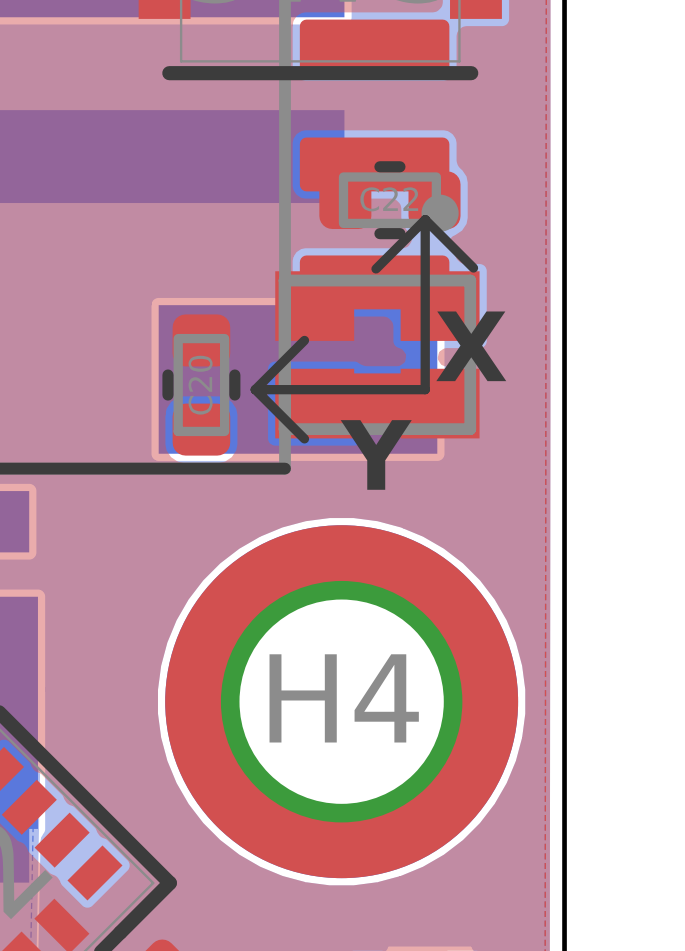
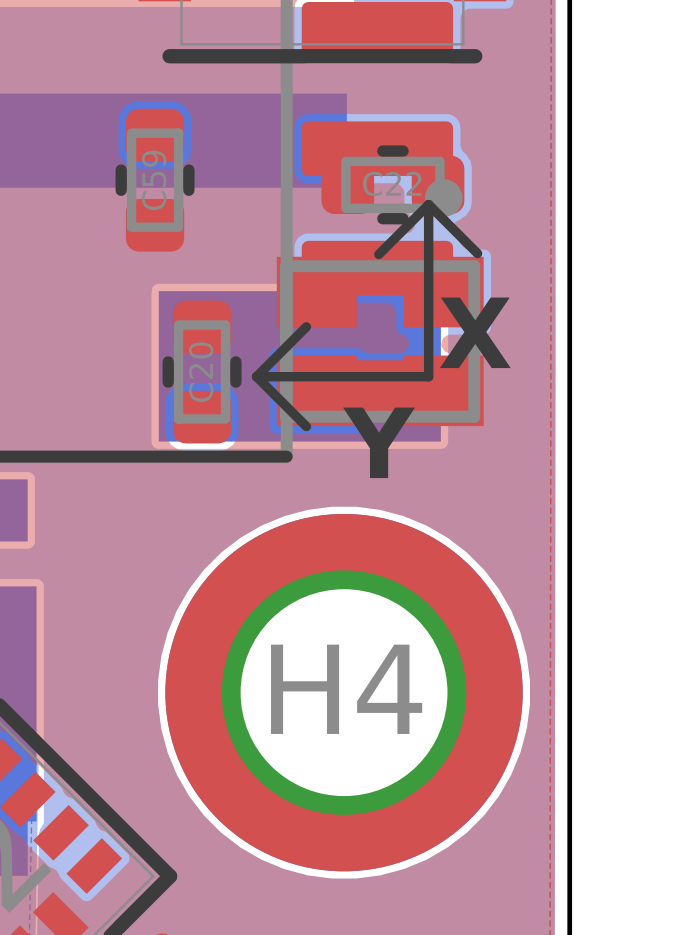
part: none -> (155, 180)

